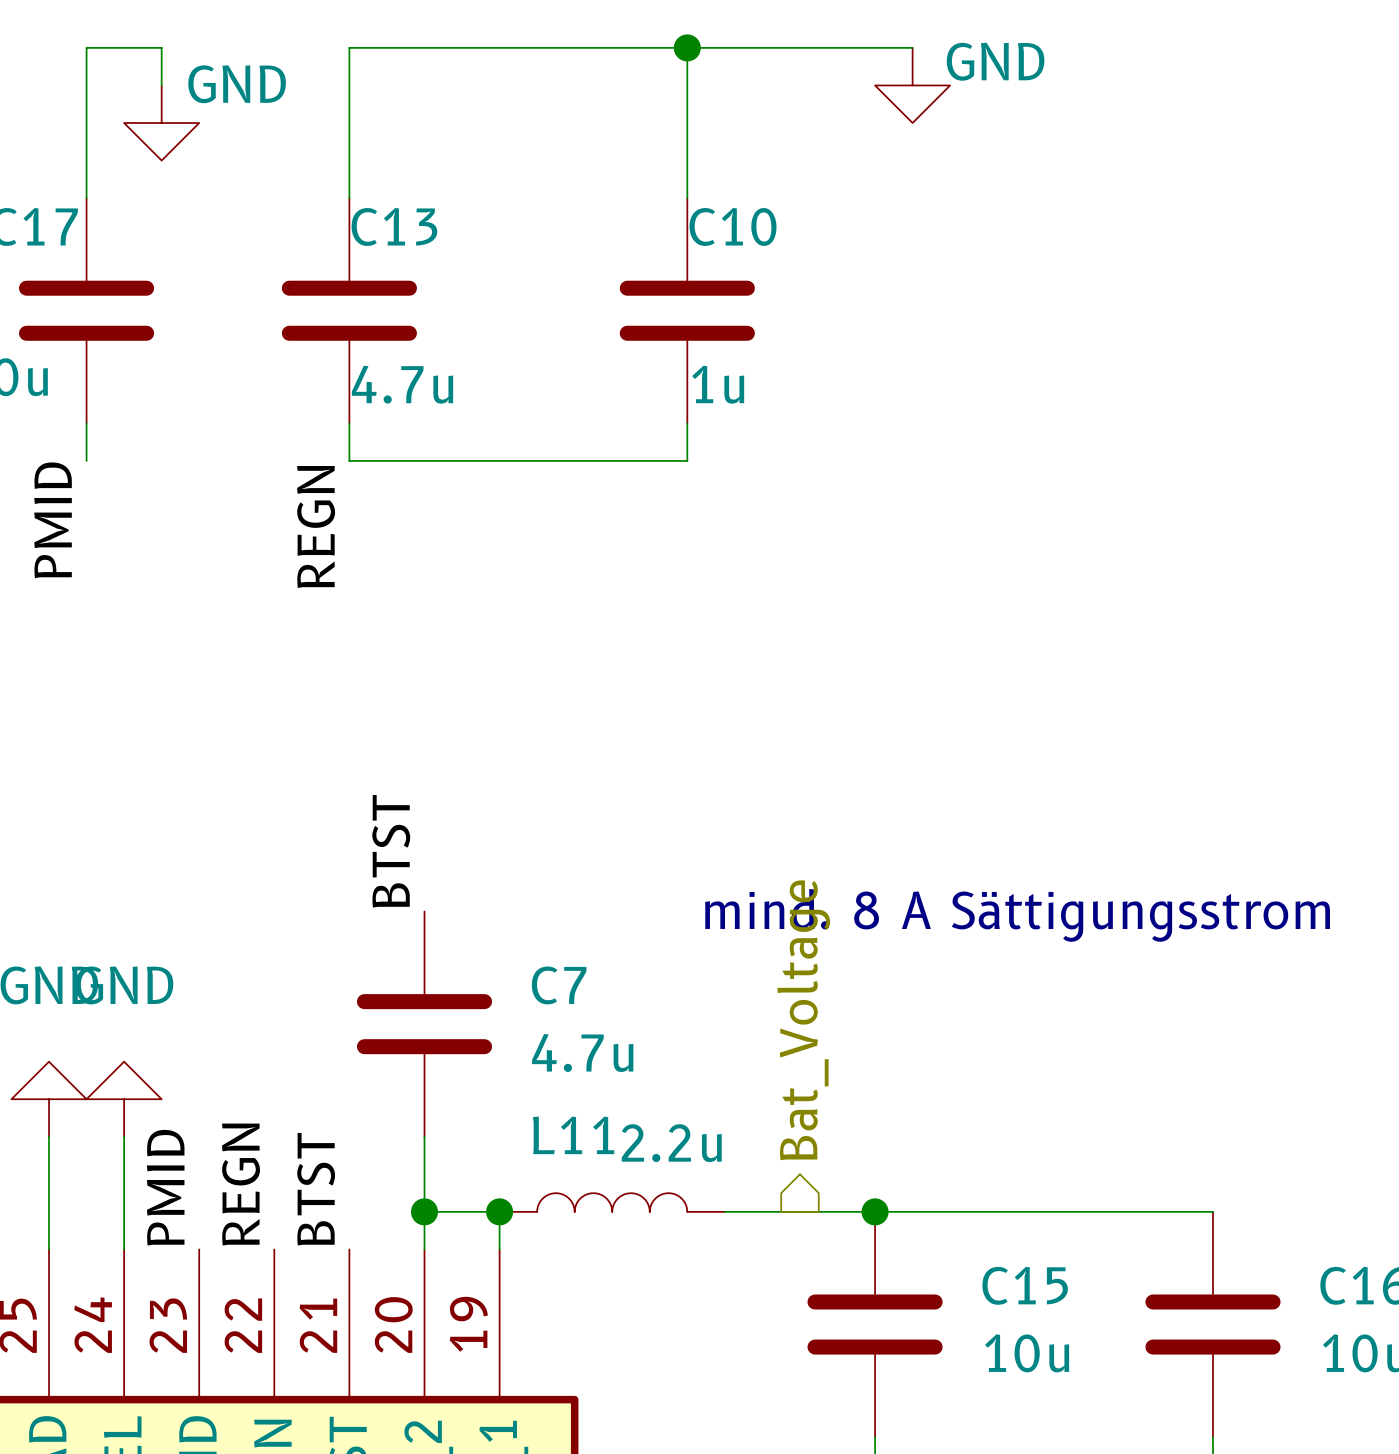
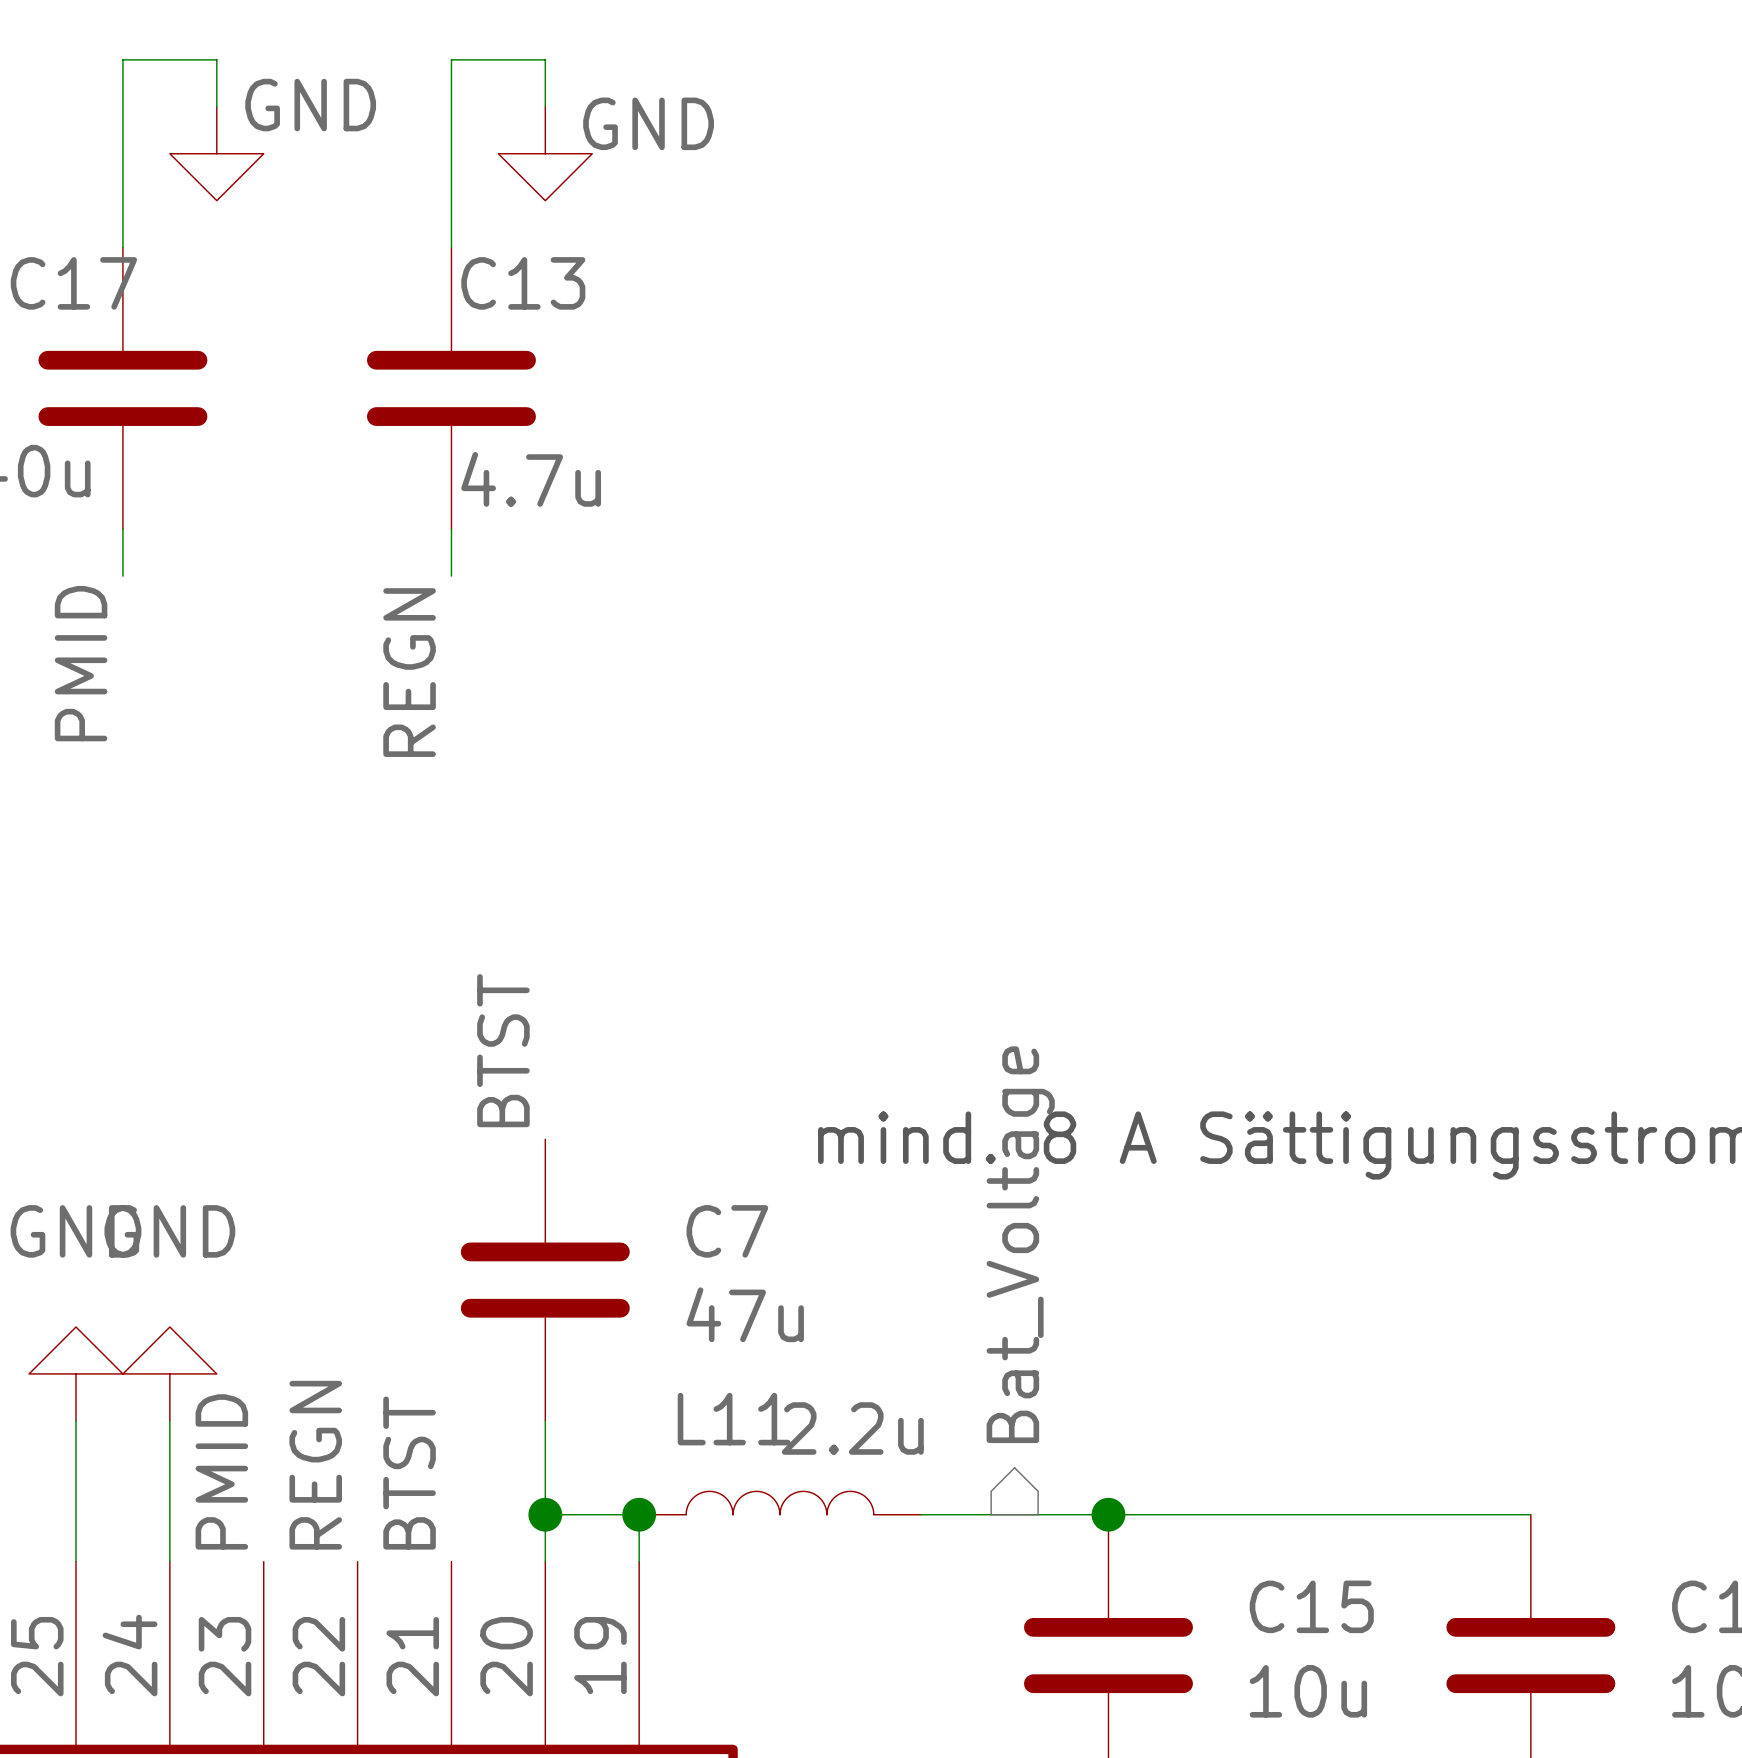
wire: (424, 47) (912, 47) -> (545, 59) (545, 106)
wire: (687, 47) (687, 198) -> none
junction: (687, 47) -> none
power symbol position: GND (912, 85) -> GND (545, 153)
C10: 1u (687, 310) -> none
wire: (687, 423) (687, 460) (349, 460) -> none
C7 value: 4.7u (582, 1052) -> 47u (745, 1314)

